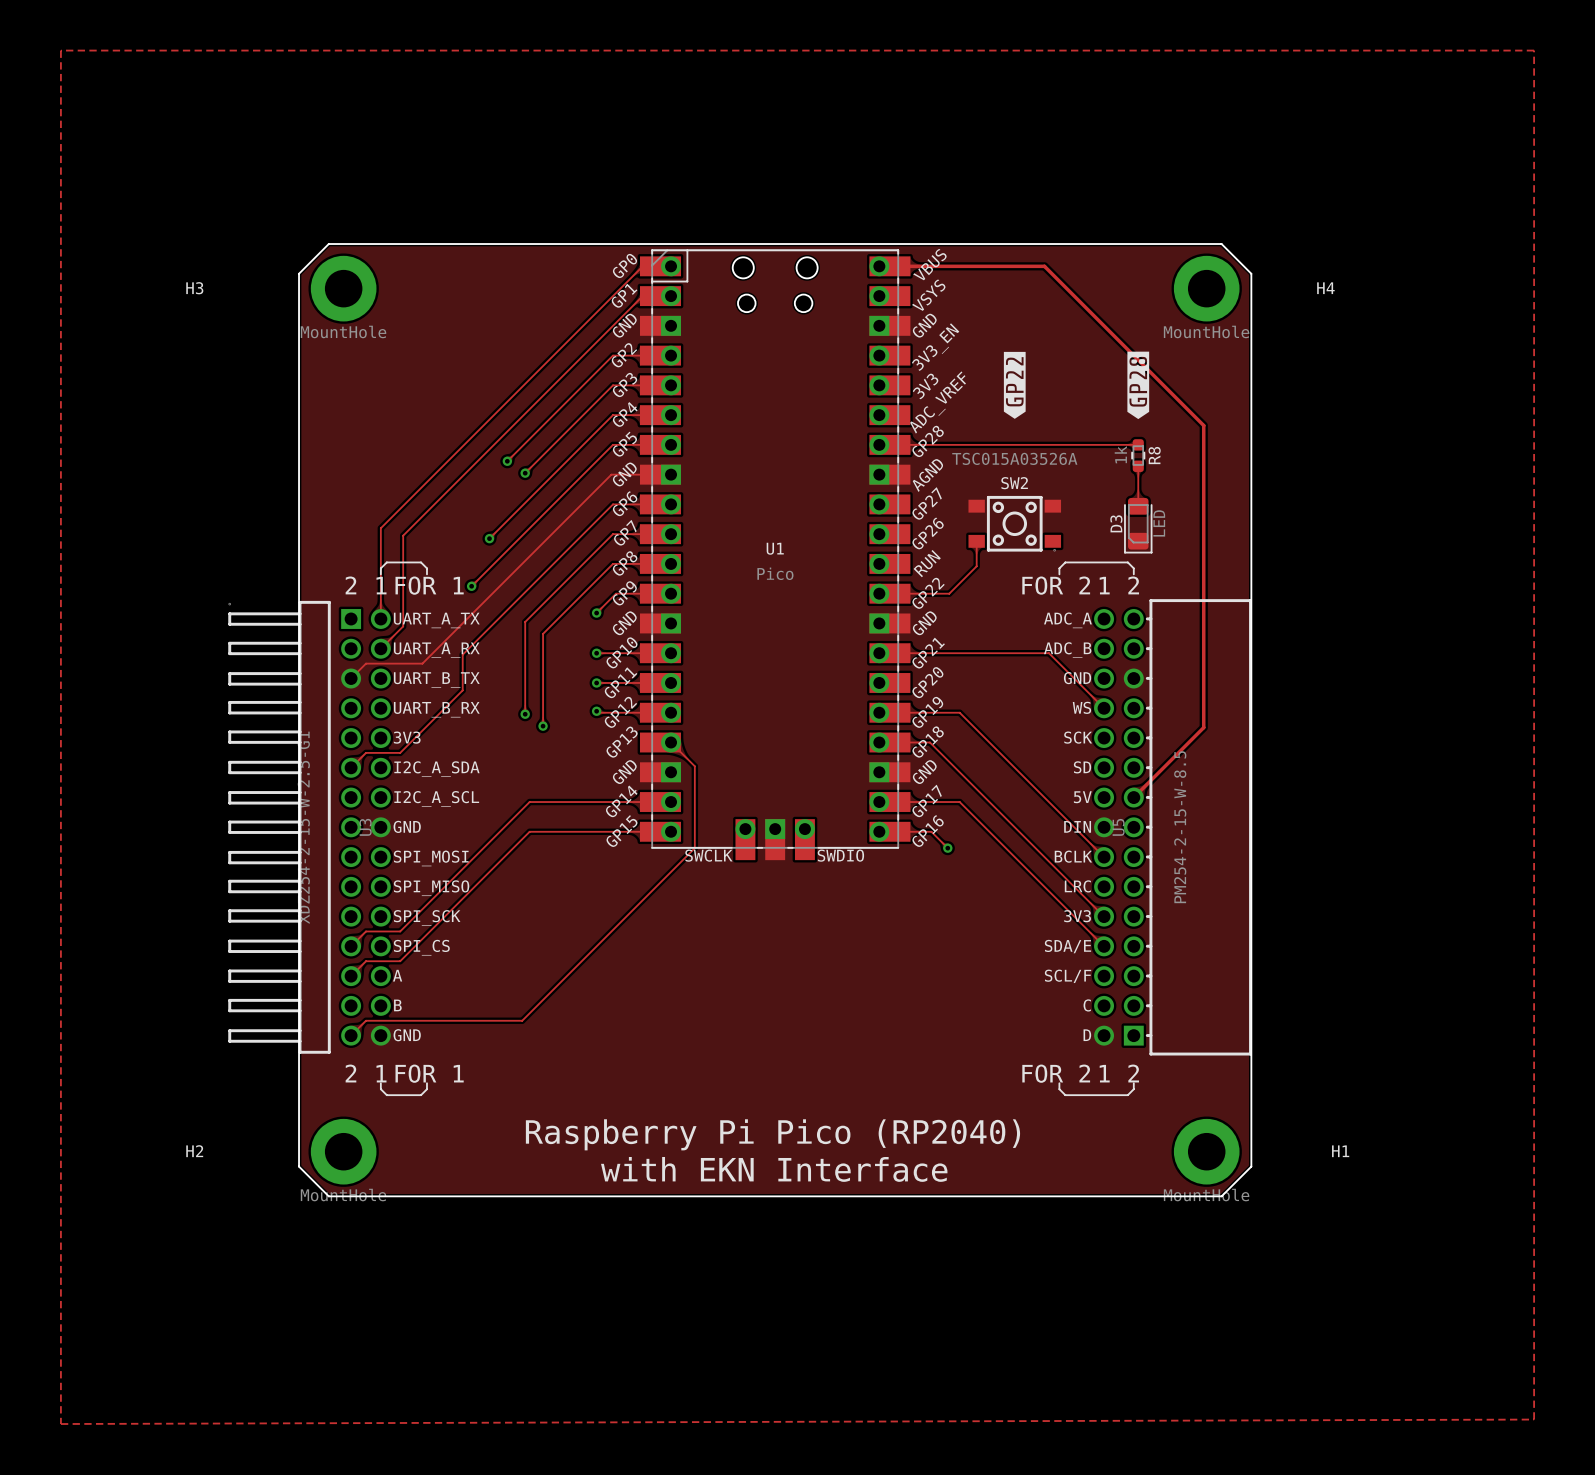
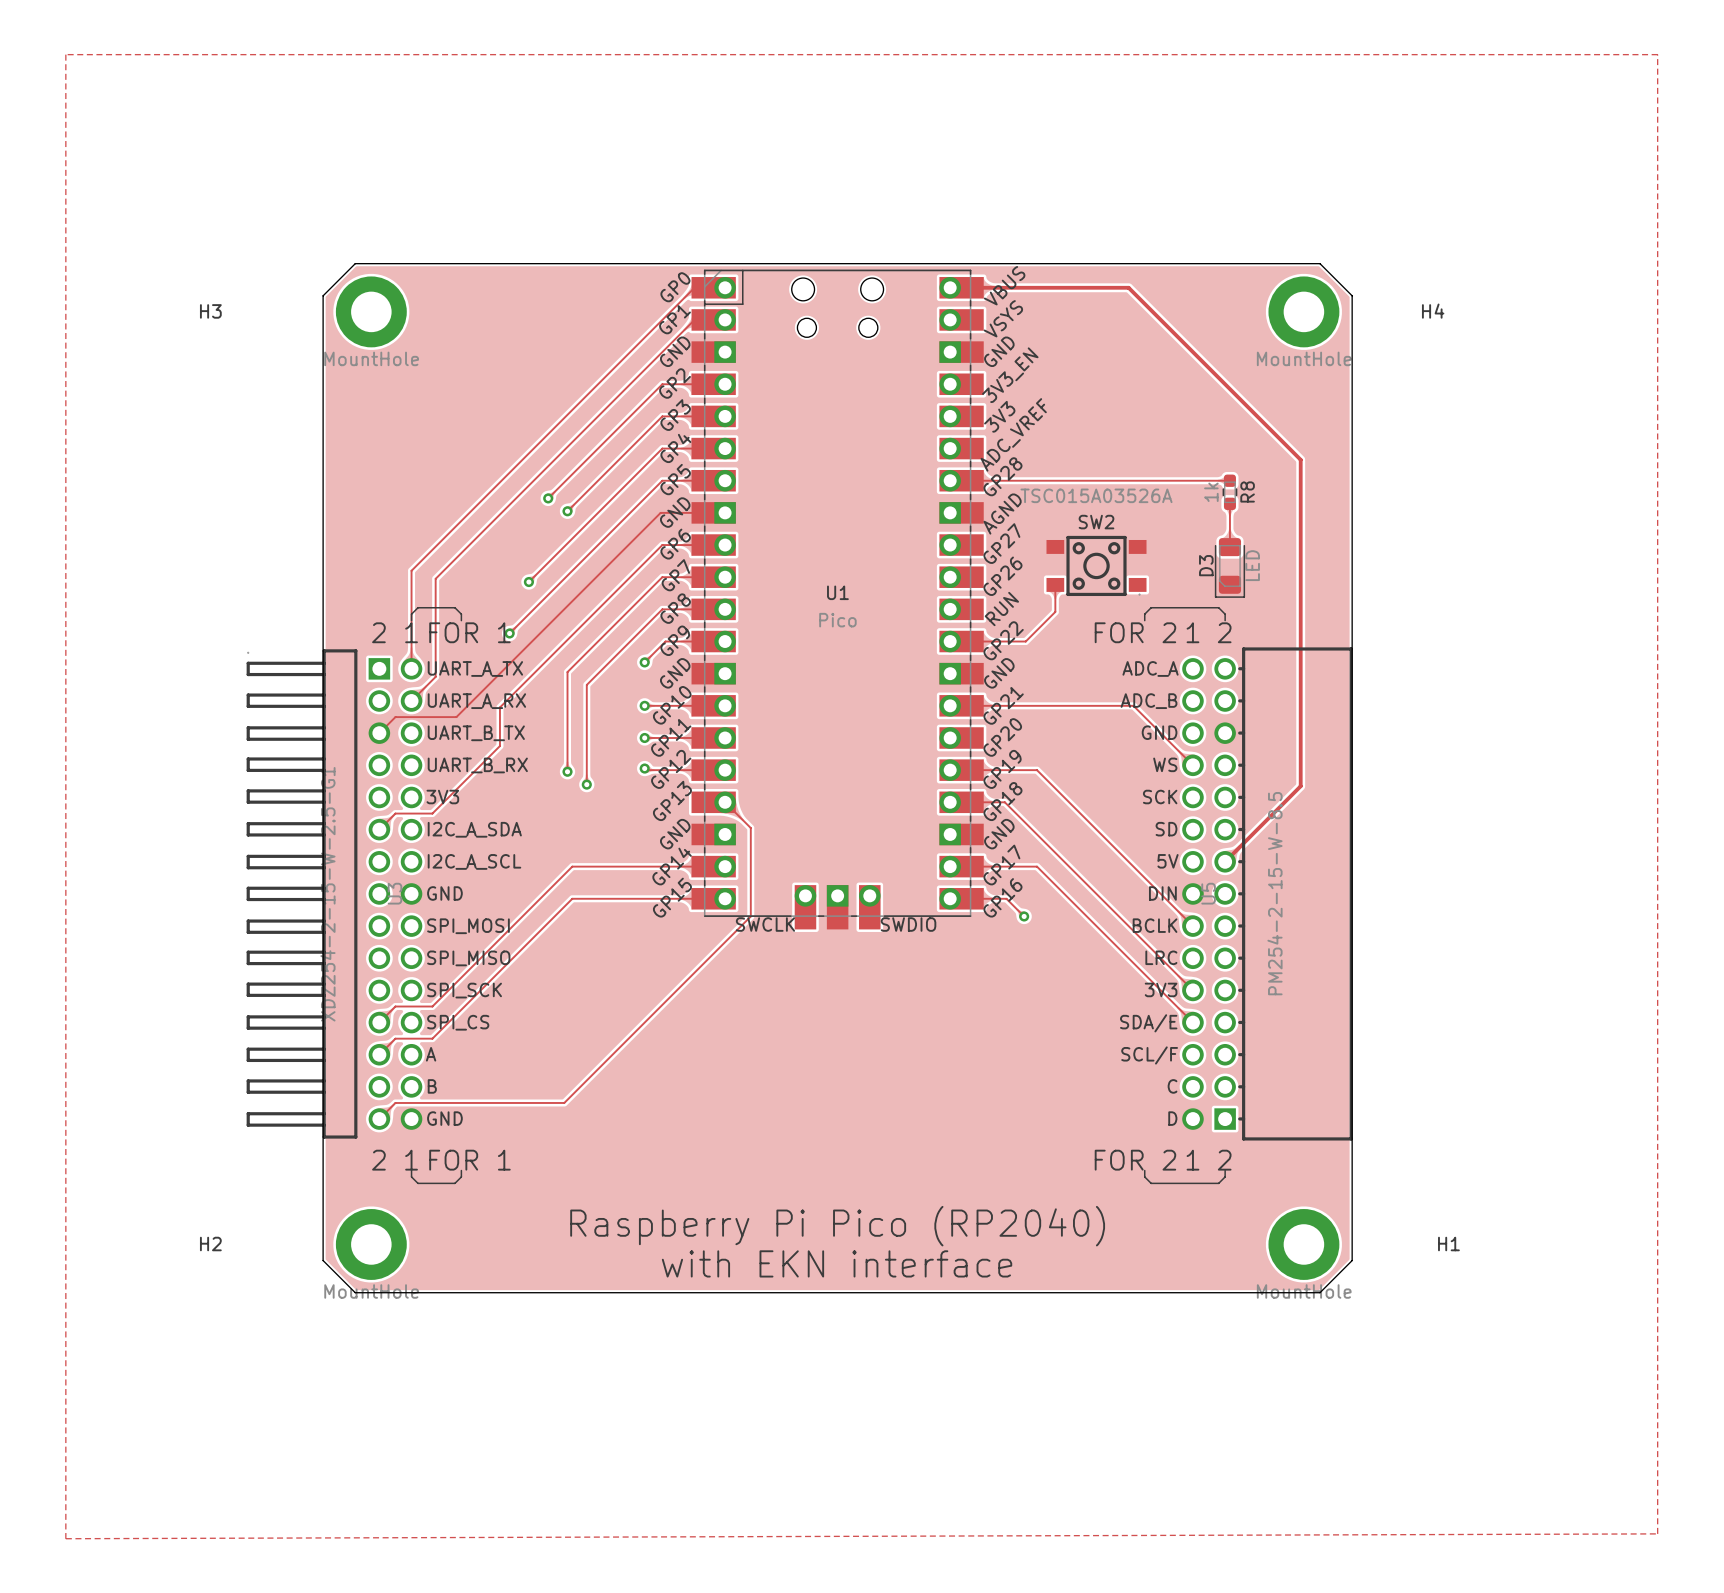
drawing: [1003, 351, 1026, 419] -> none
drawing: [1127, 351, 1150, 420] -> none
text: with EKN Interface (774, 1169) -> with EKN interface (837, 1263)

